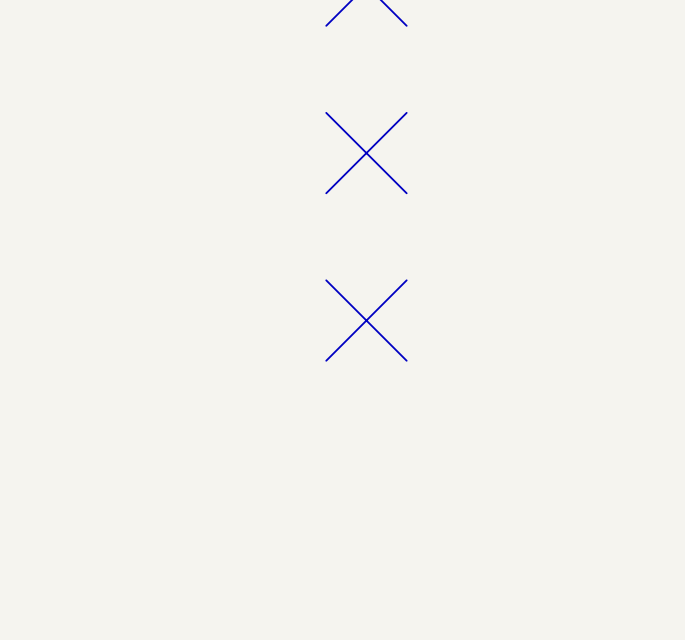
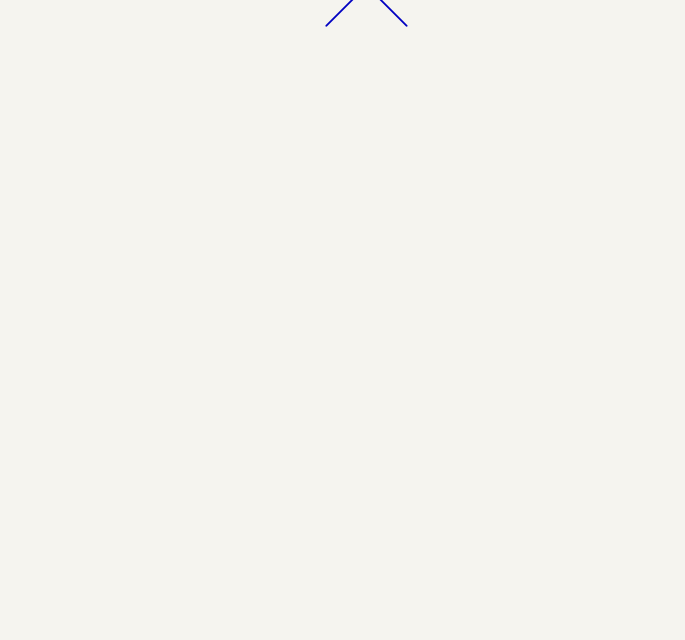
no-connect mark: (366, 153) -> none
no-connect mark: (366, 320) -> none

